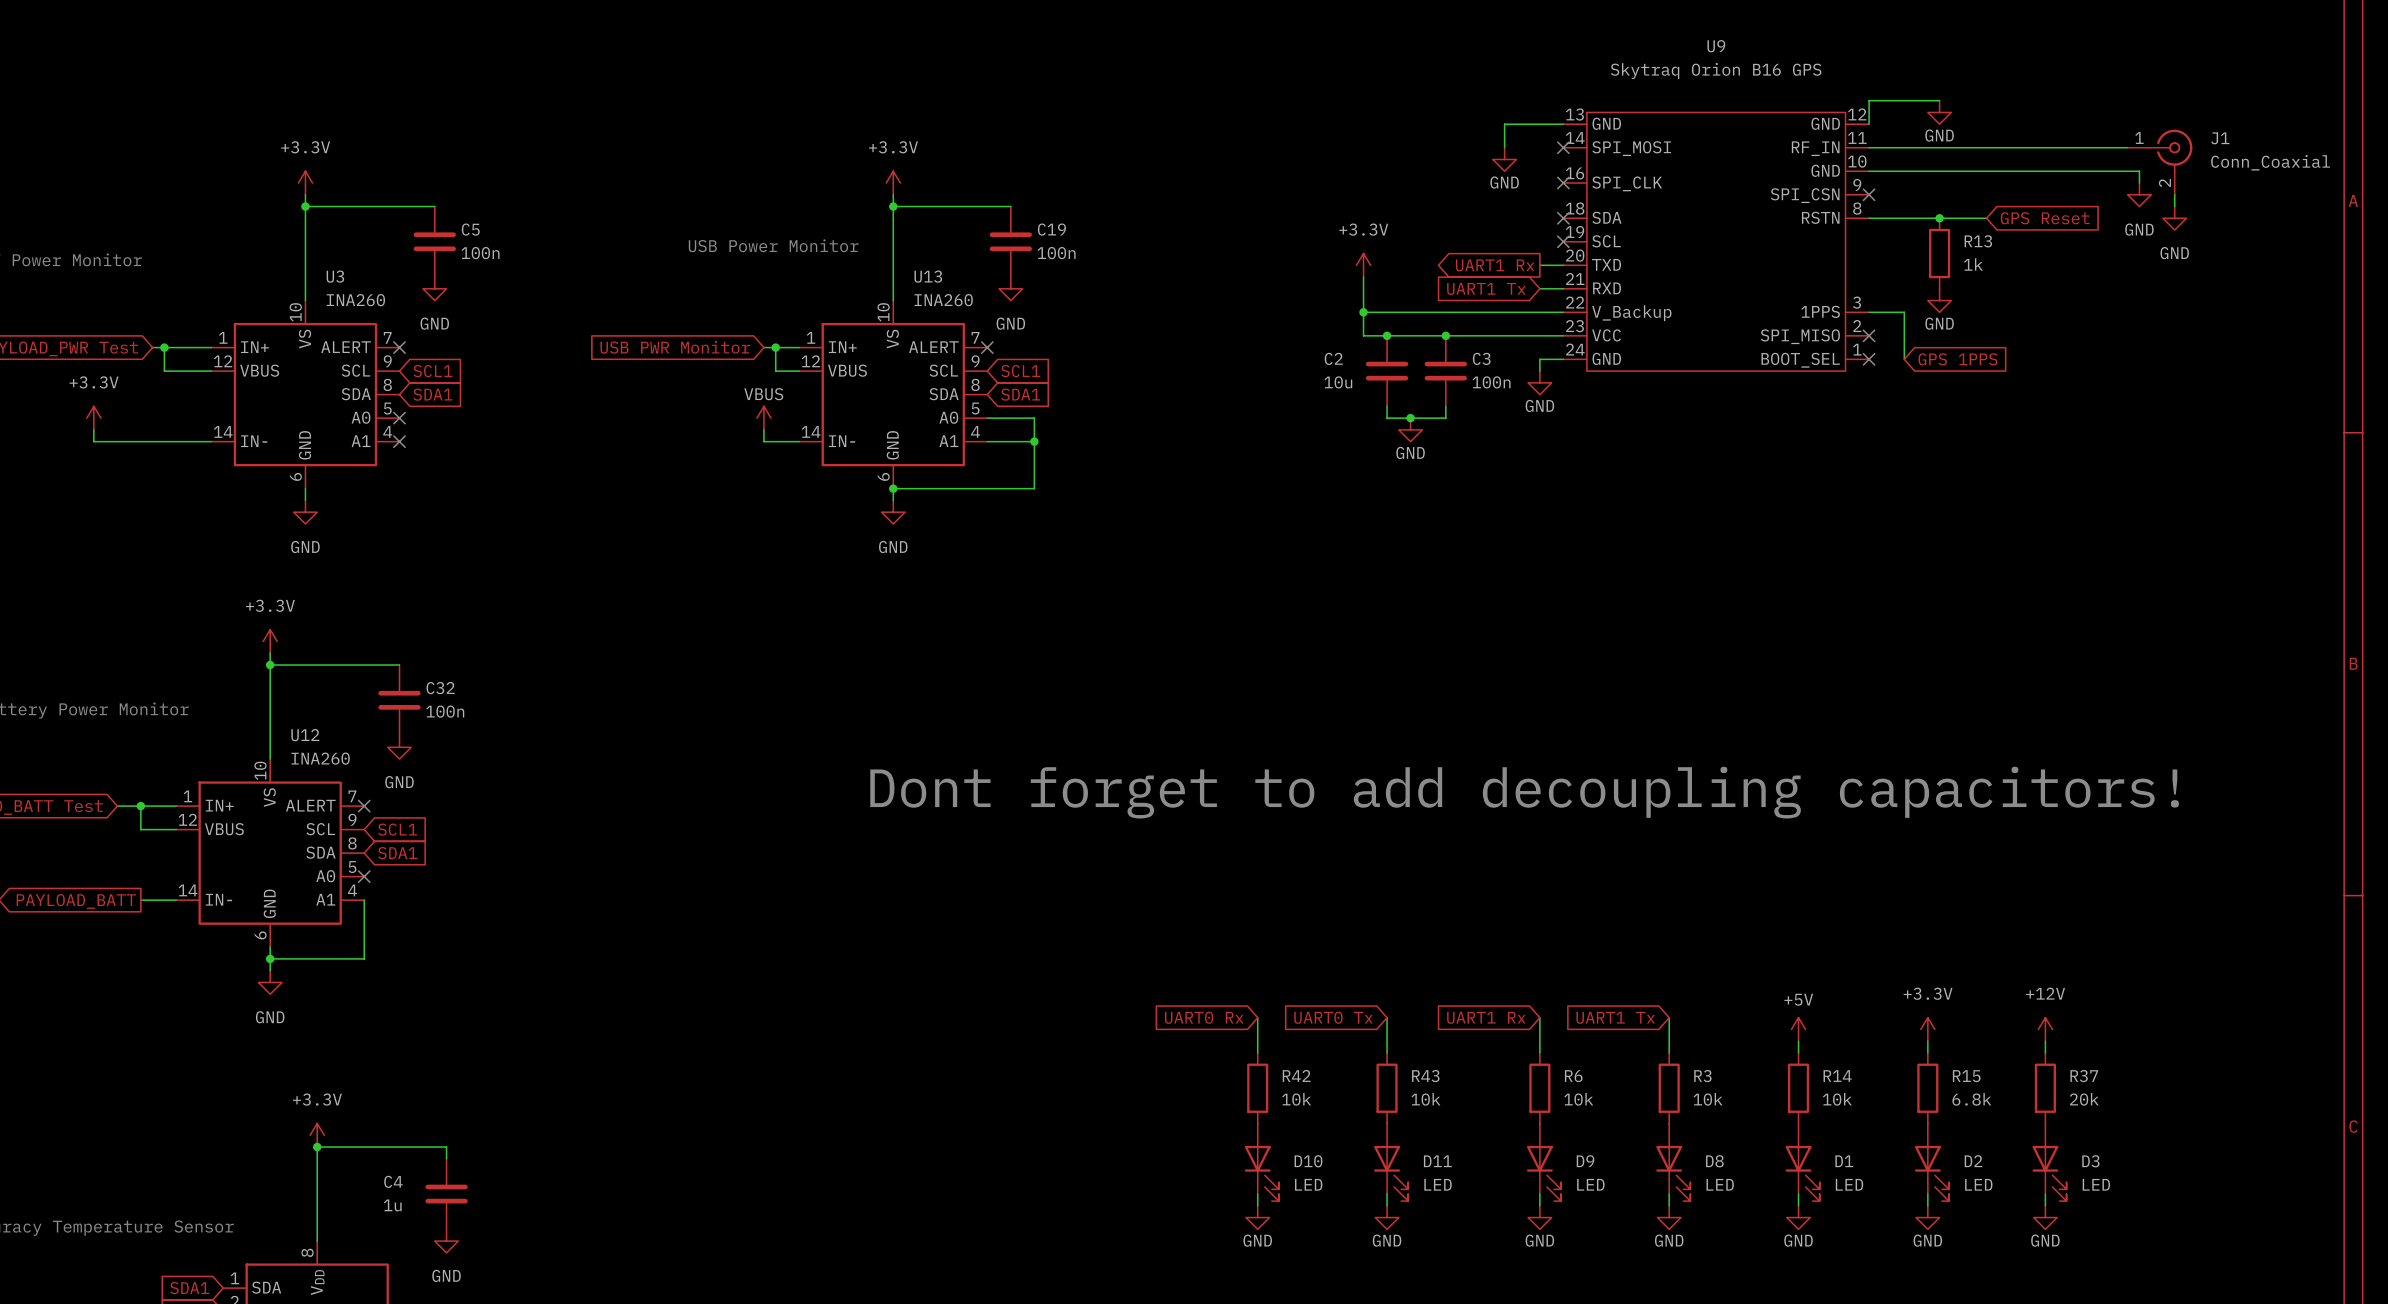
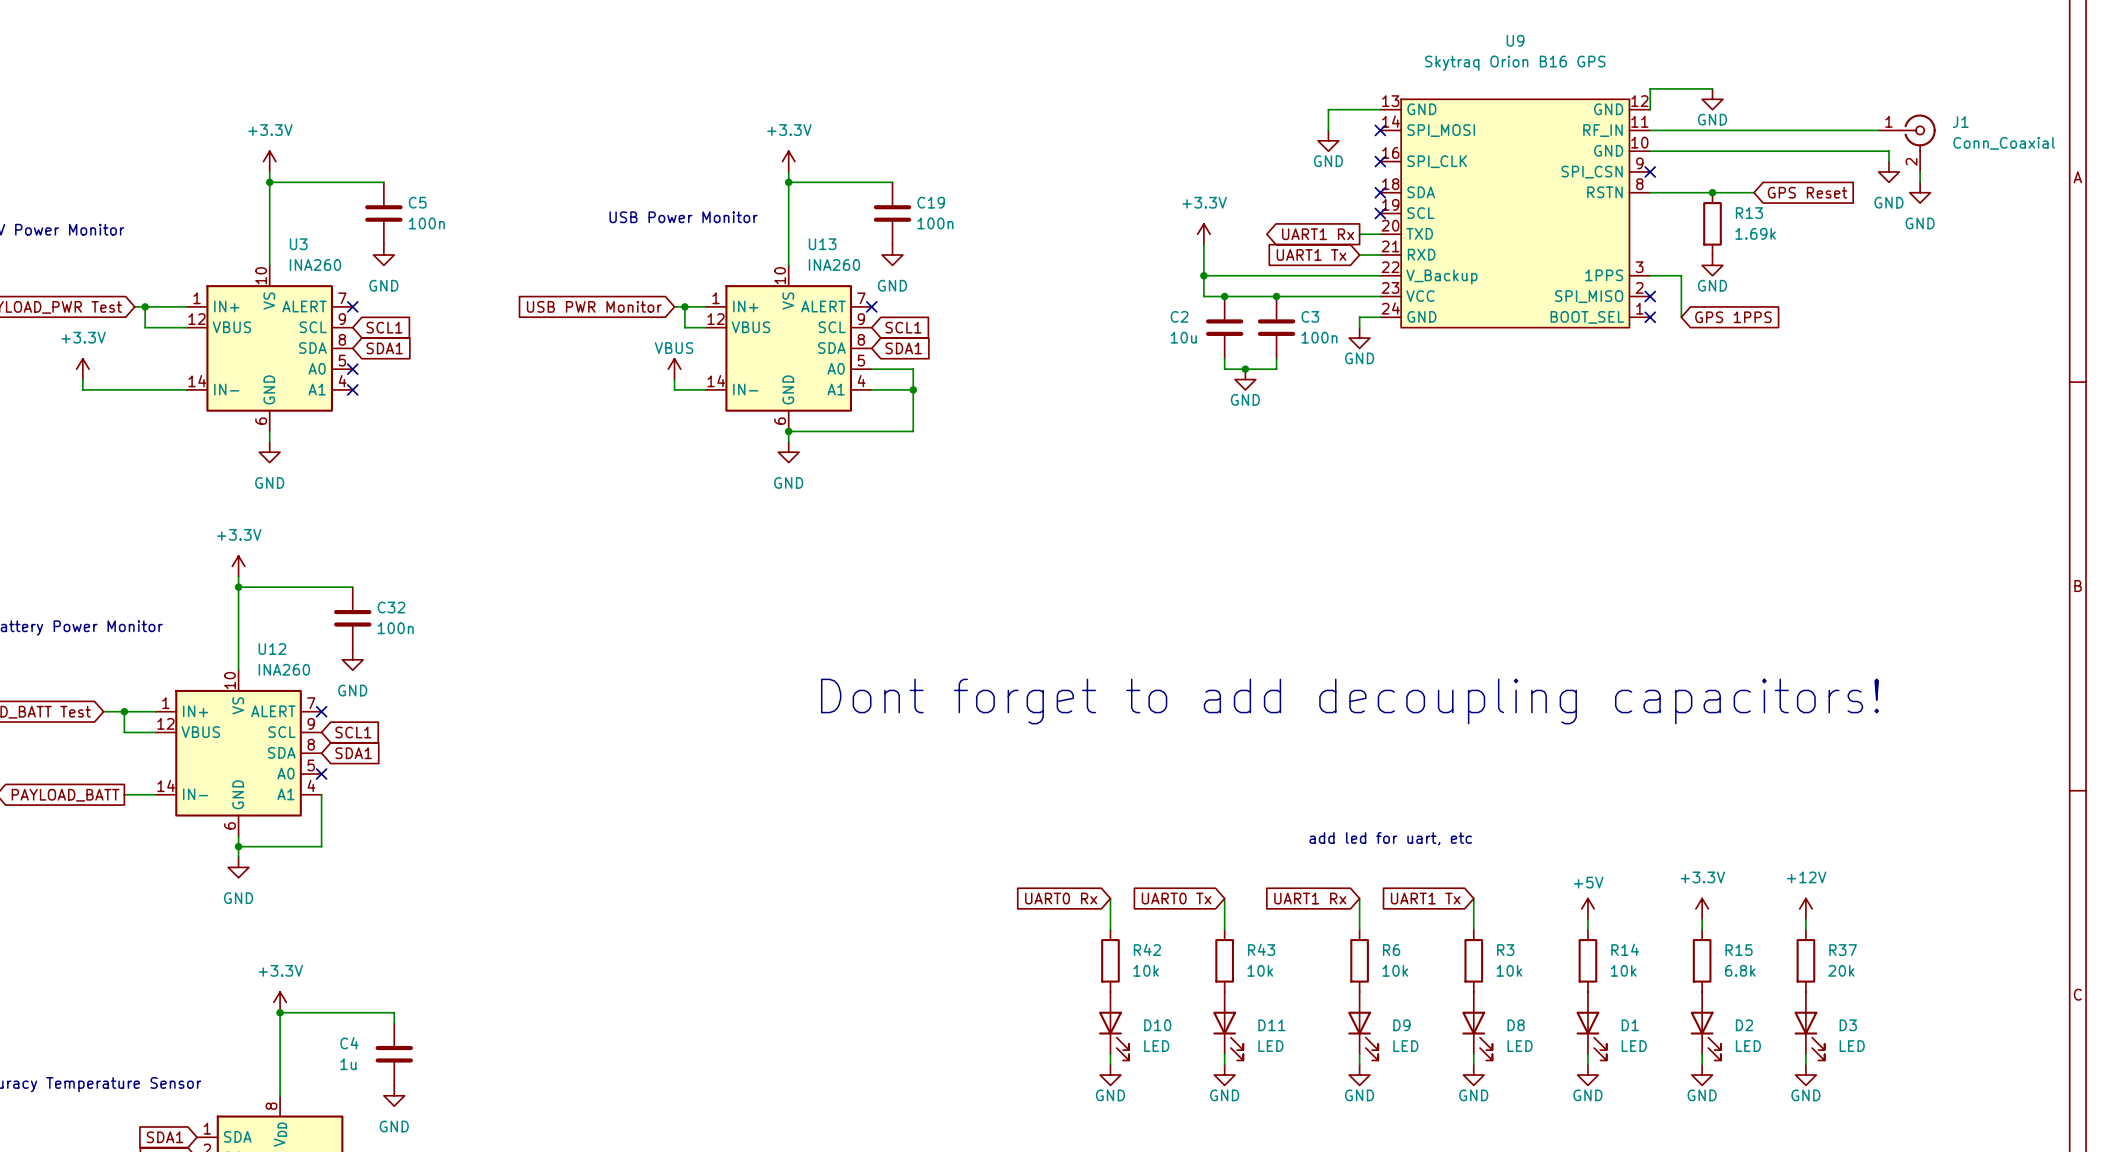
R13 value: 1k (1973, 264) -> 1.69k (1755, 233)
text: none -> add led for uart, etc (1390, 838)

